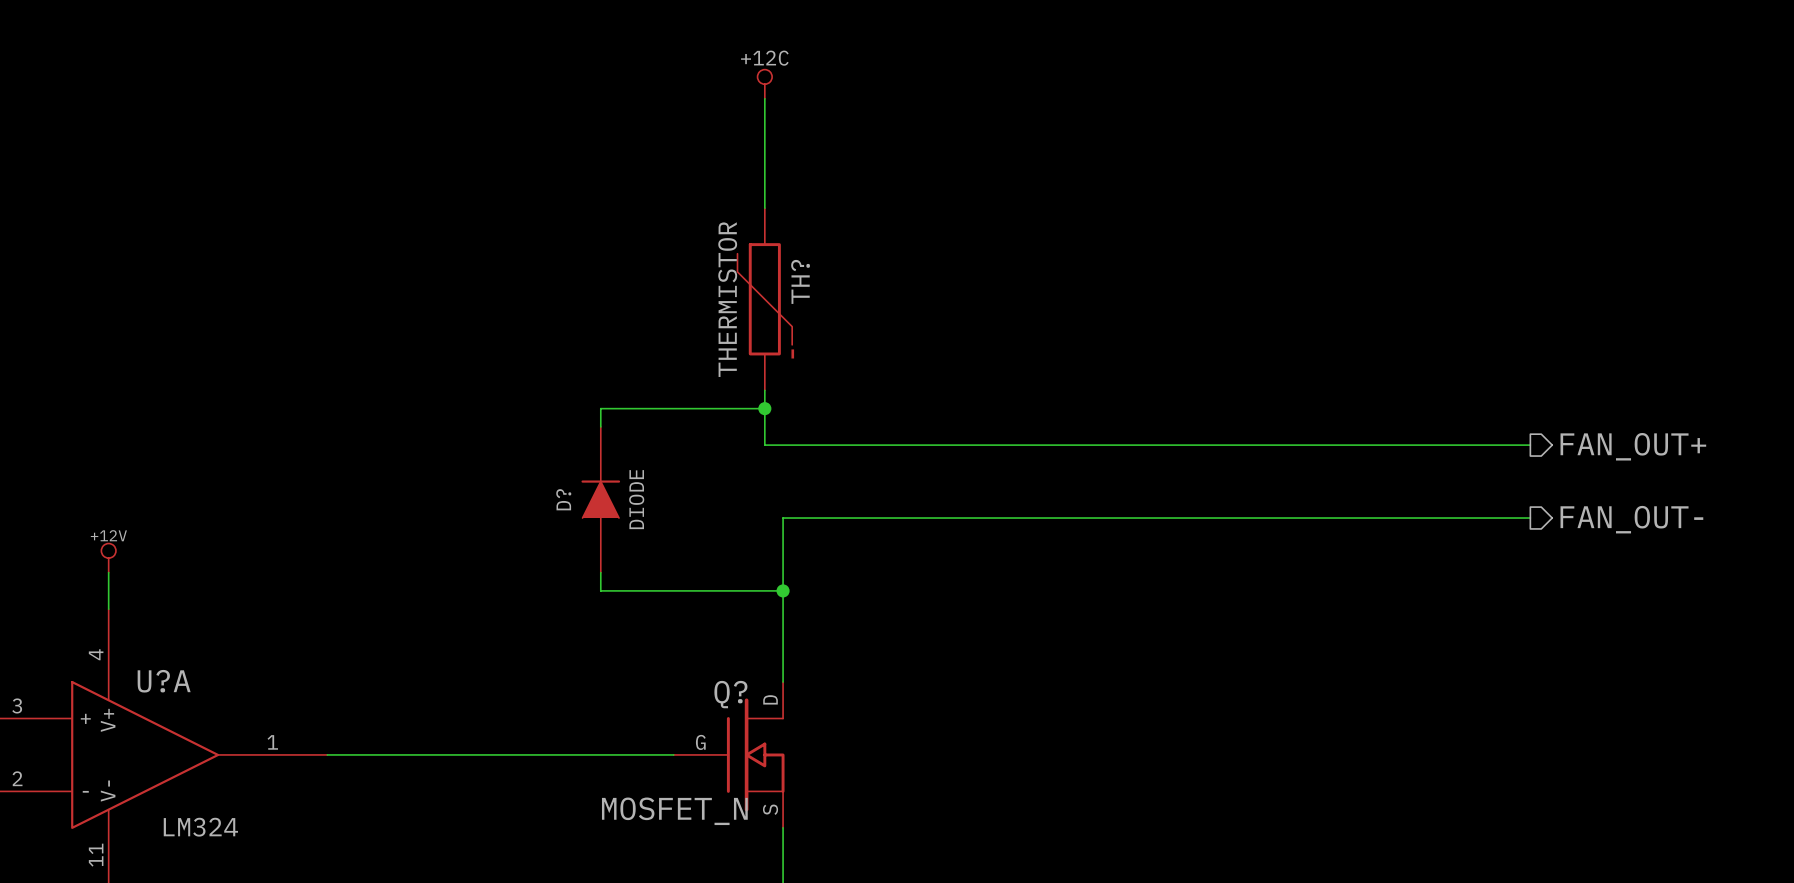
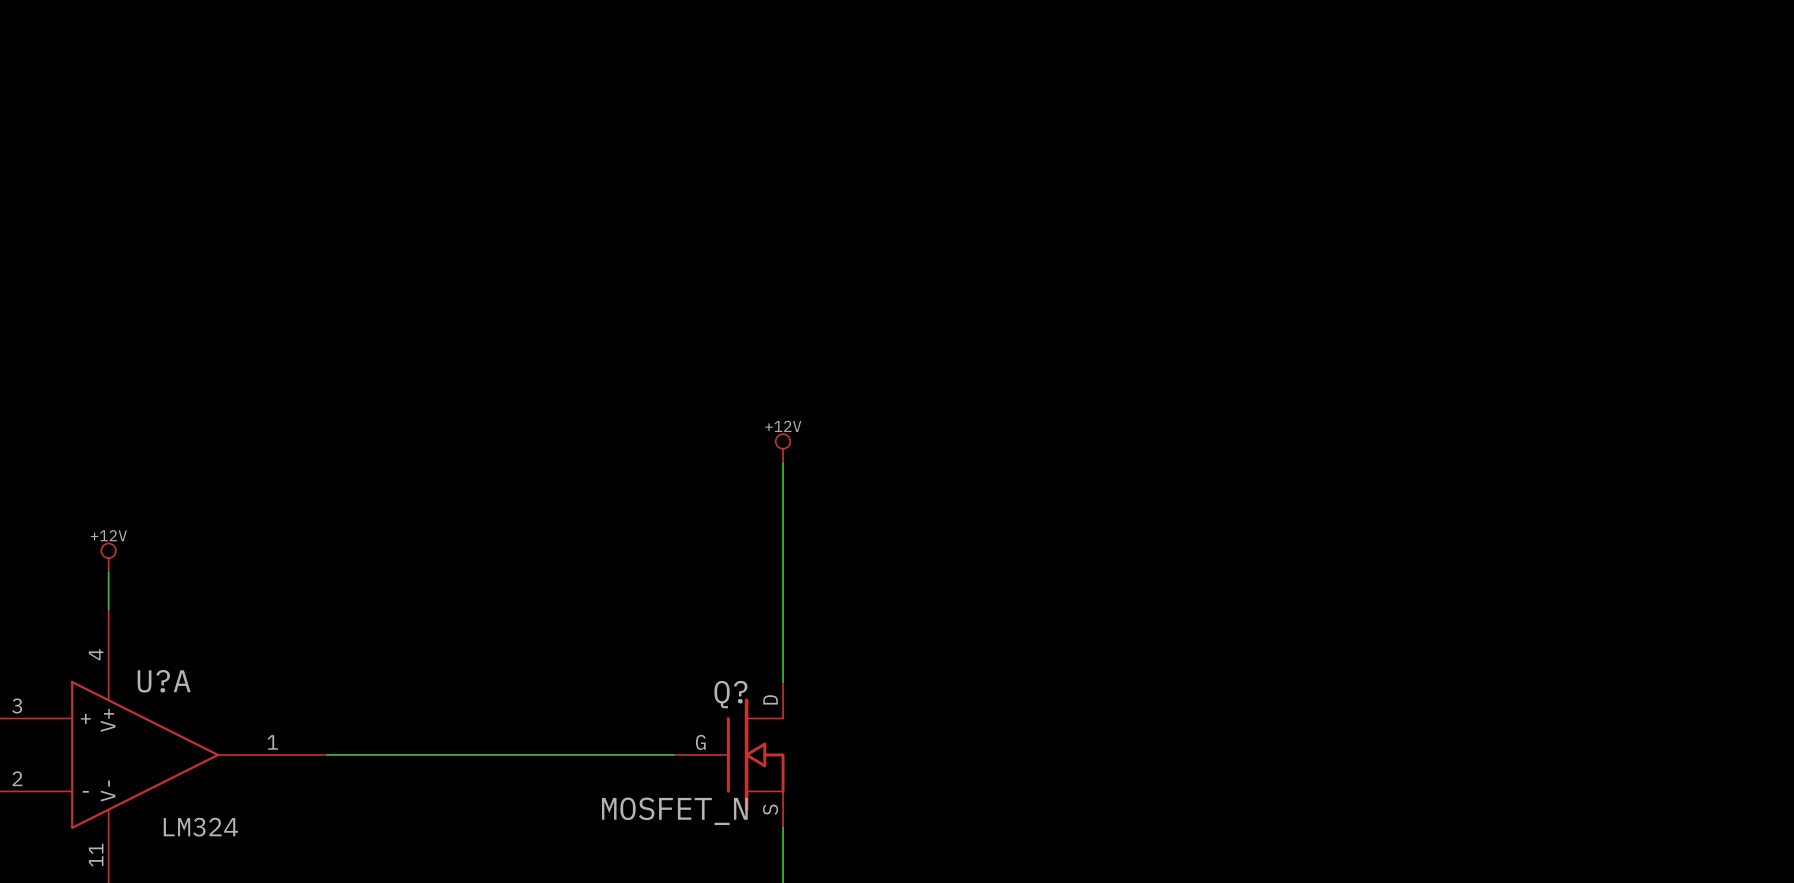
power symbol: +12C (764, 84) -> none
wire: (764, 98) (764, 208) -> none
TH?: THERMISTOR (764, 299) -> none
wire: (764, 390) (764, 445) (1530, 445) -> none
wire: (764, 408) (600, 408) (600, 426) -> none
junction: (764, 408) -> none
hierarchical label: FAN_OUT+ (1633, 446) -> none
power symbol: none -> +12V (783, 448)
D?: DIODE (600, 499) -> none
wire: (783, 518) (1530, 518) -> (783, 518) (783, 463)
hierarchical label: FAN_OUT- (1631, 519) -> none
wire: (600, 572) (600, 590) (783, 590) -> none
junction: (783, 590) -> none

